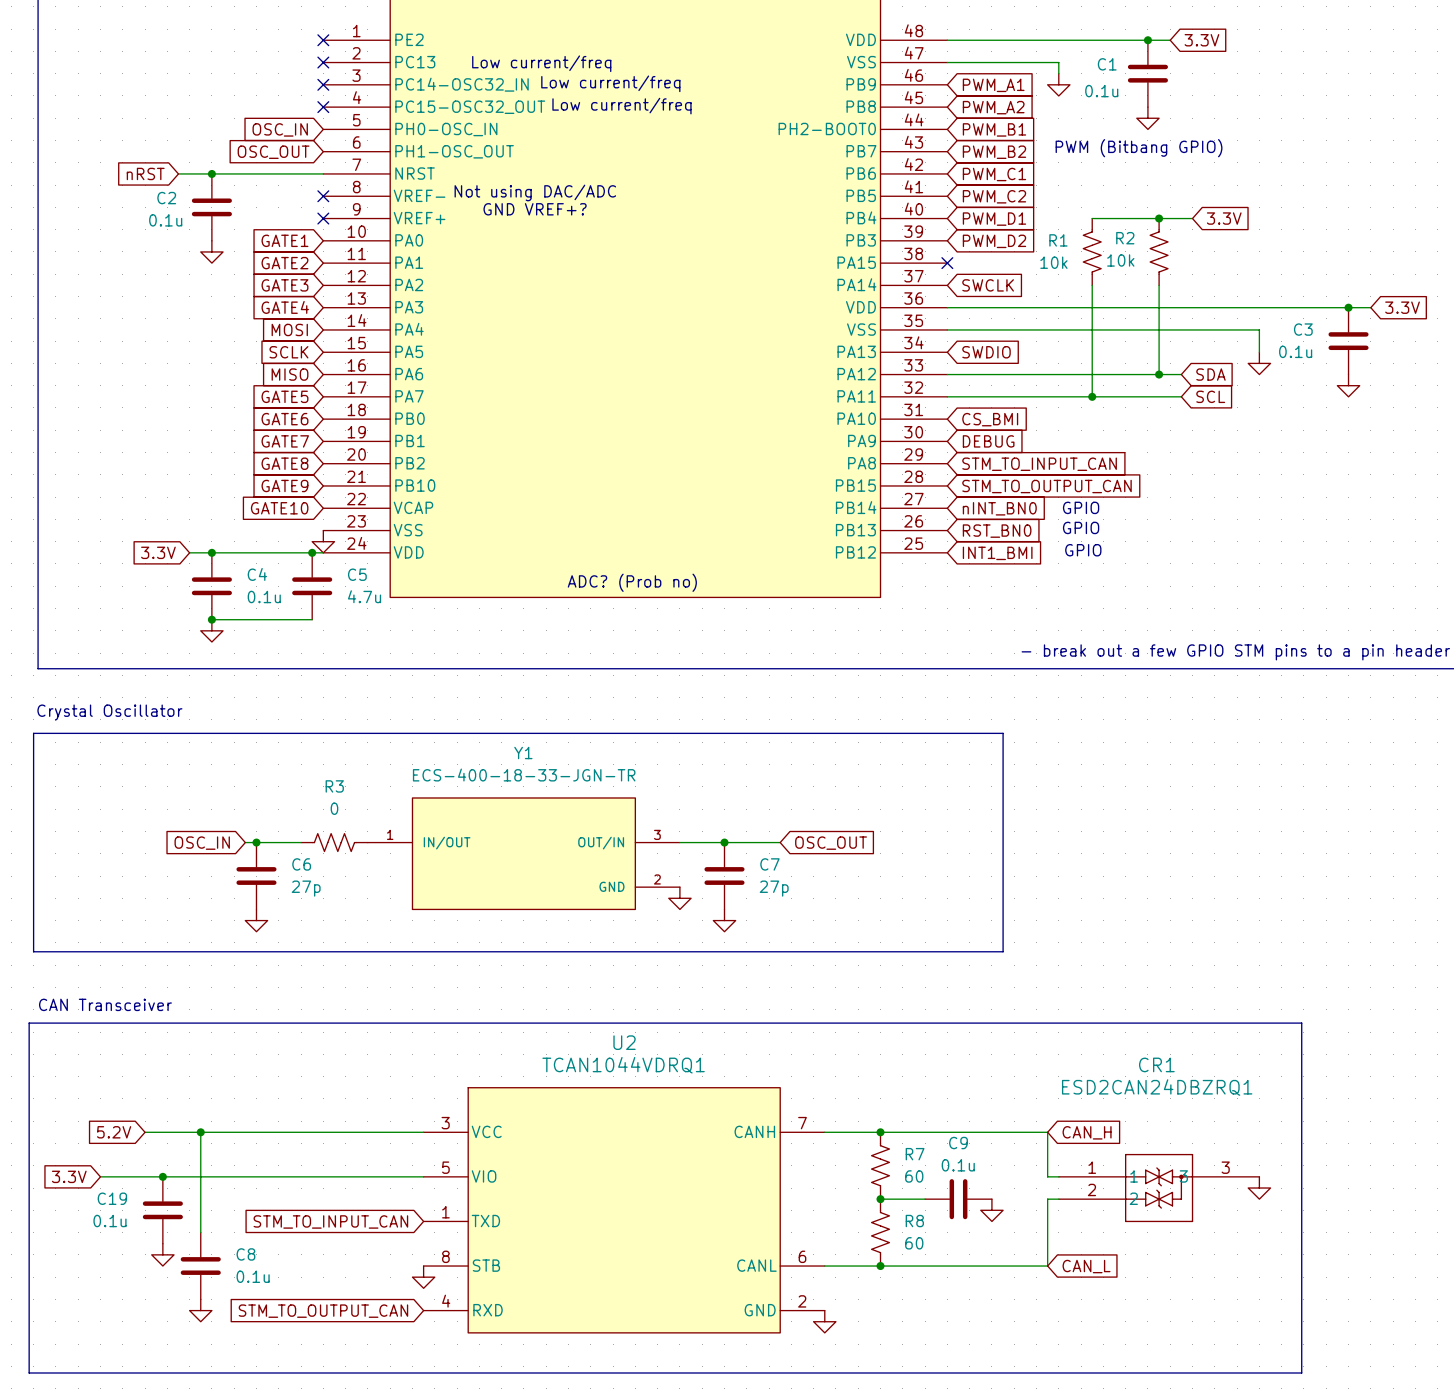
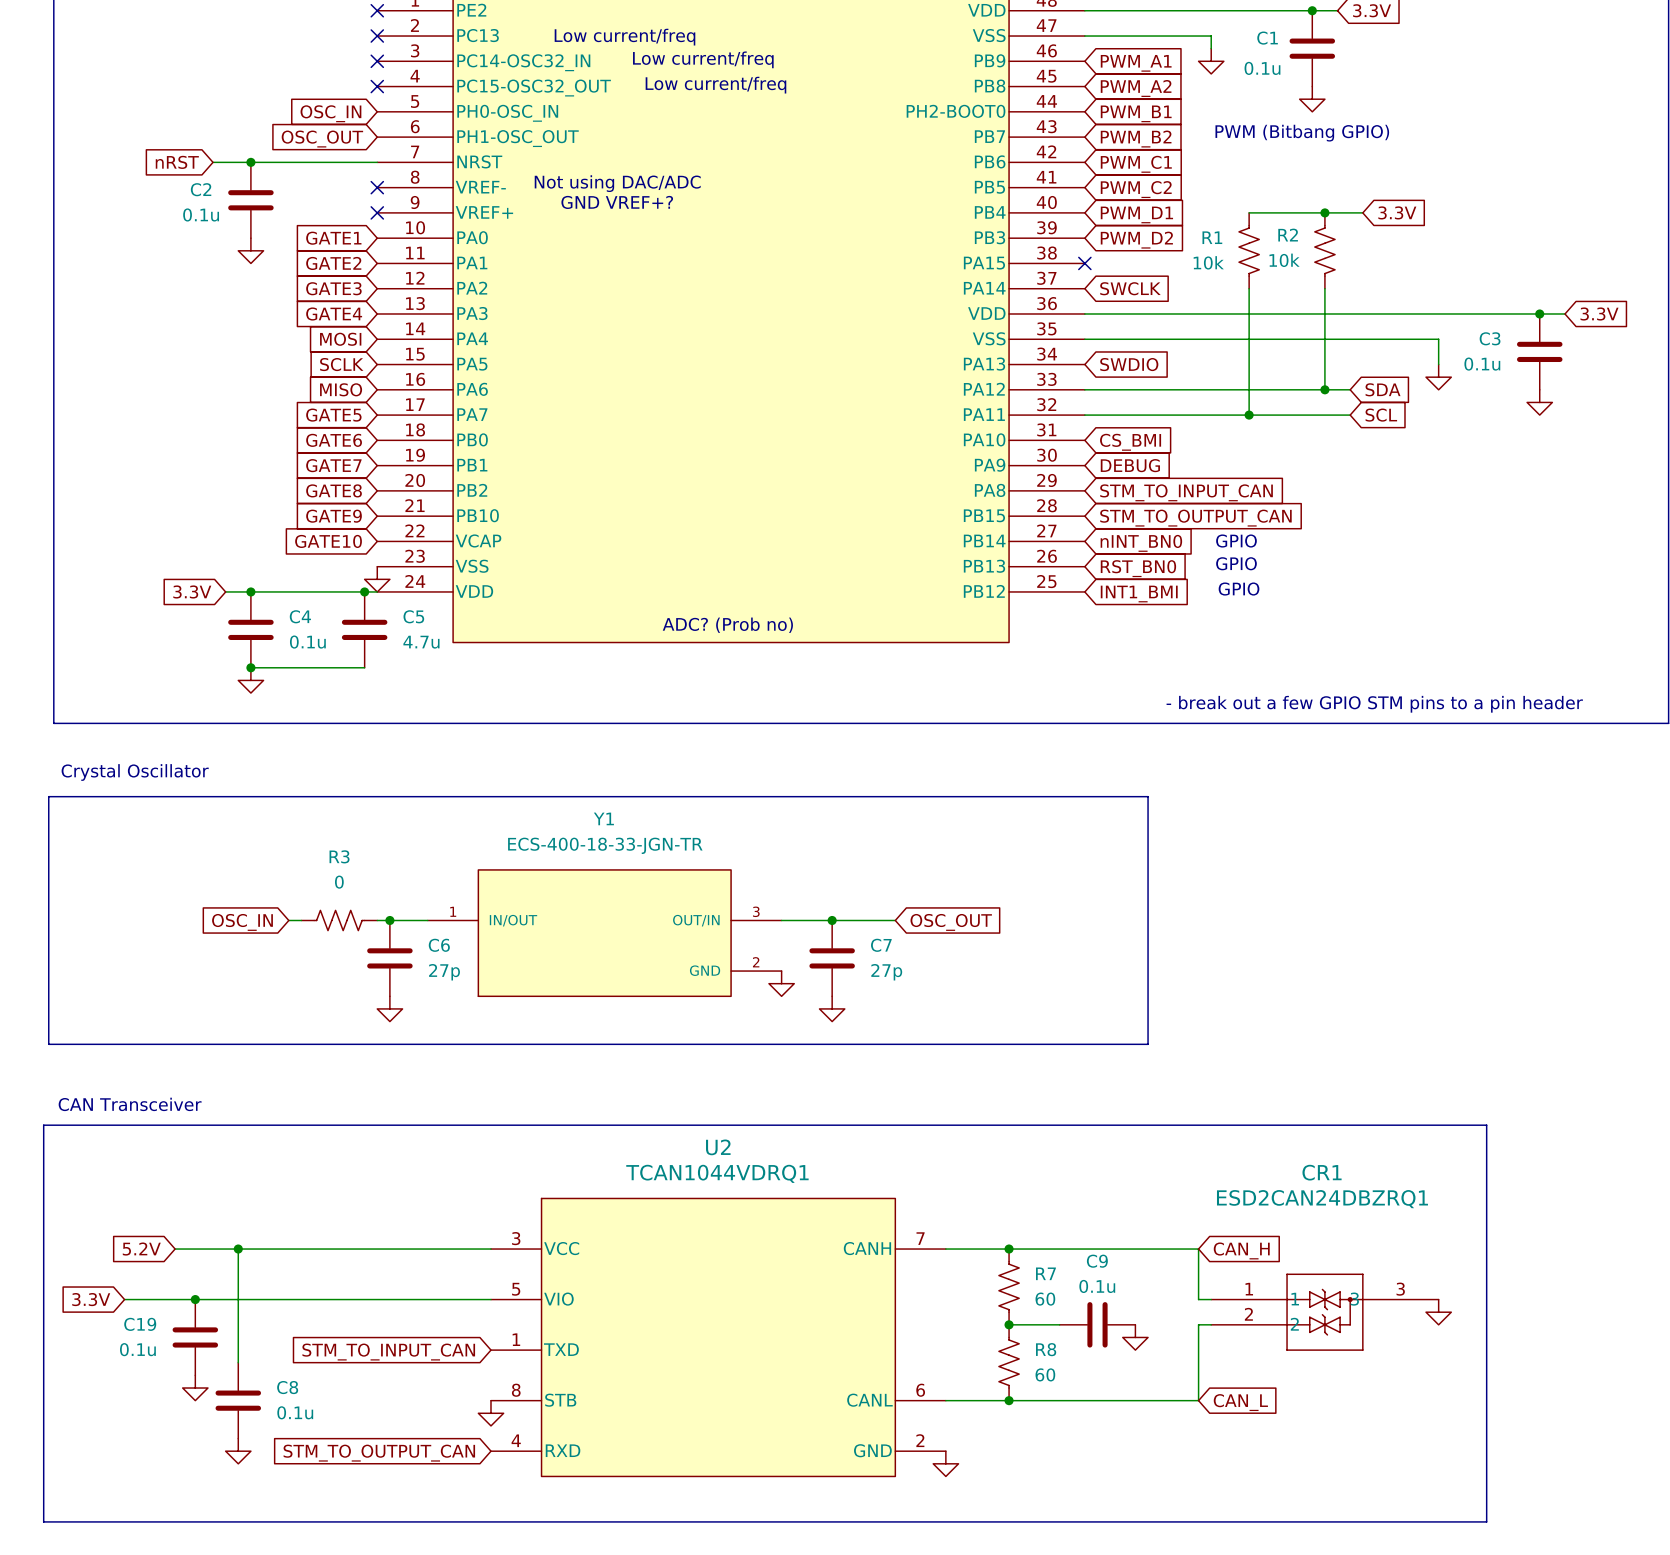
wire: (256, 842) (301, 842) -> (377, 920) (427, 920)
junction: (256, 842) -> none
junction: none -> (389, 920)
R3 position: (334, 842) -> (339, 920)
C6 position: (256, 876) -> (389, 958)
power symbol position: (256, 920) -> (389, 1008)

